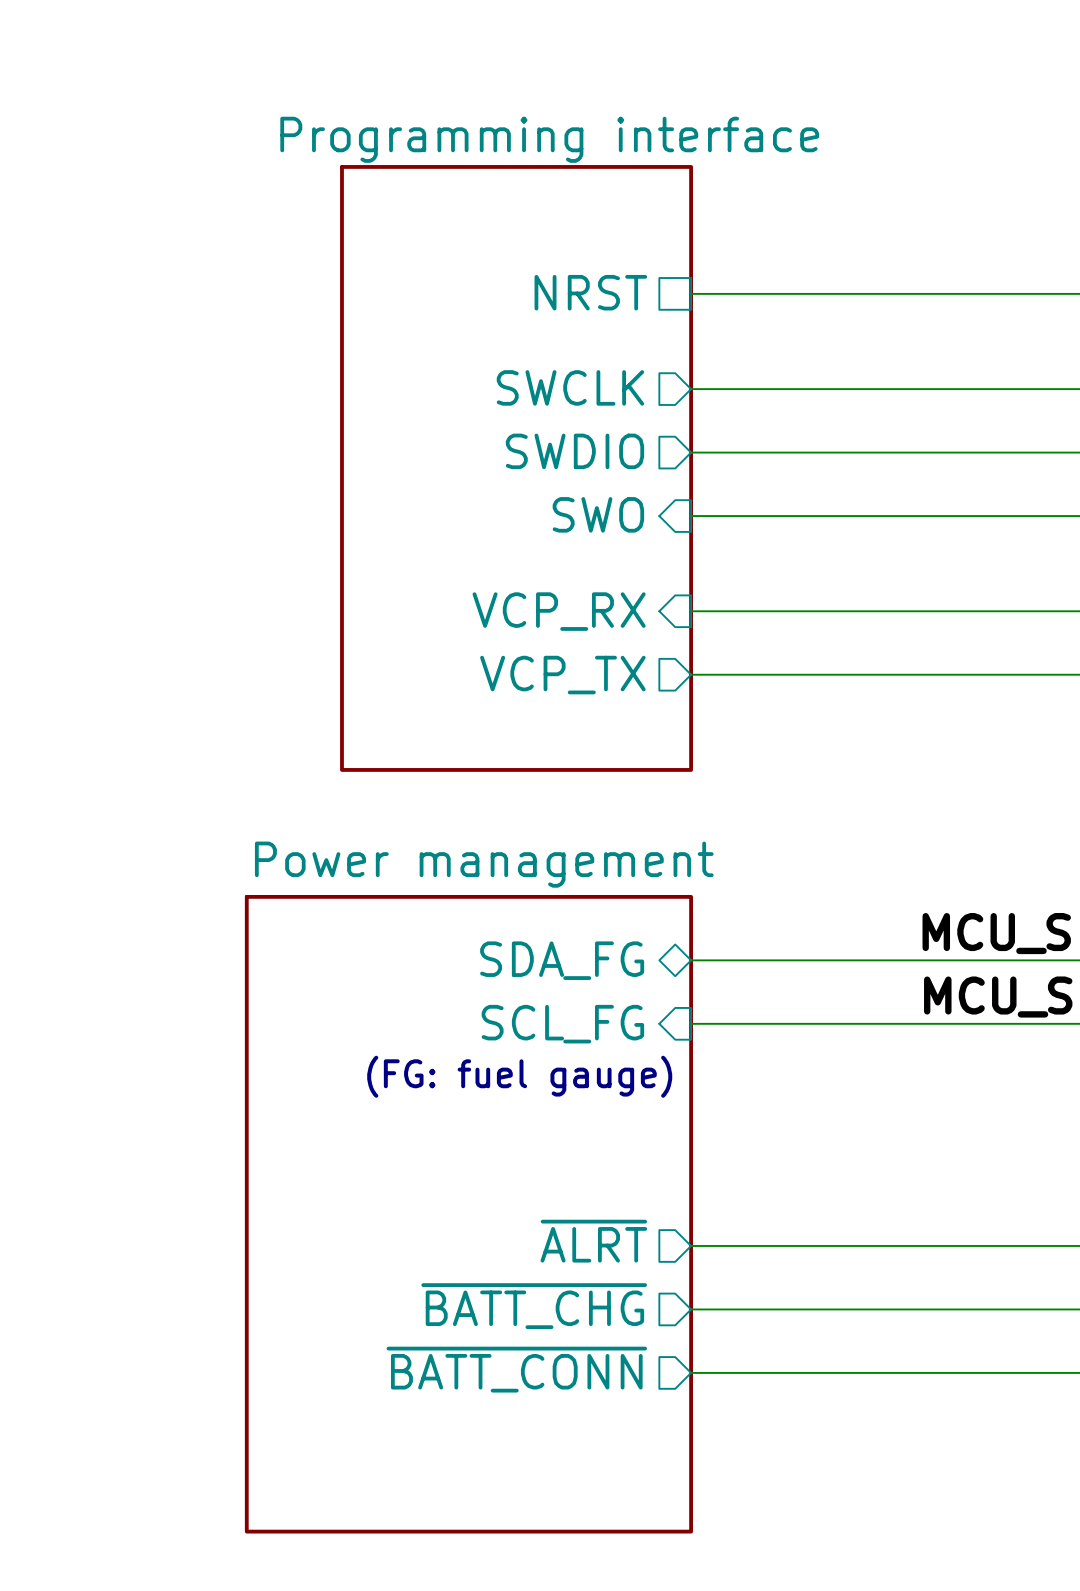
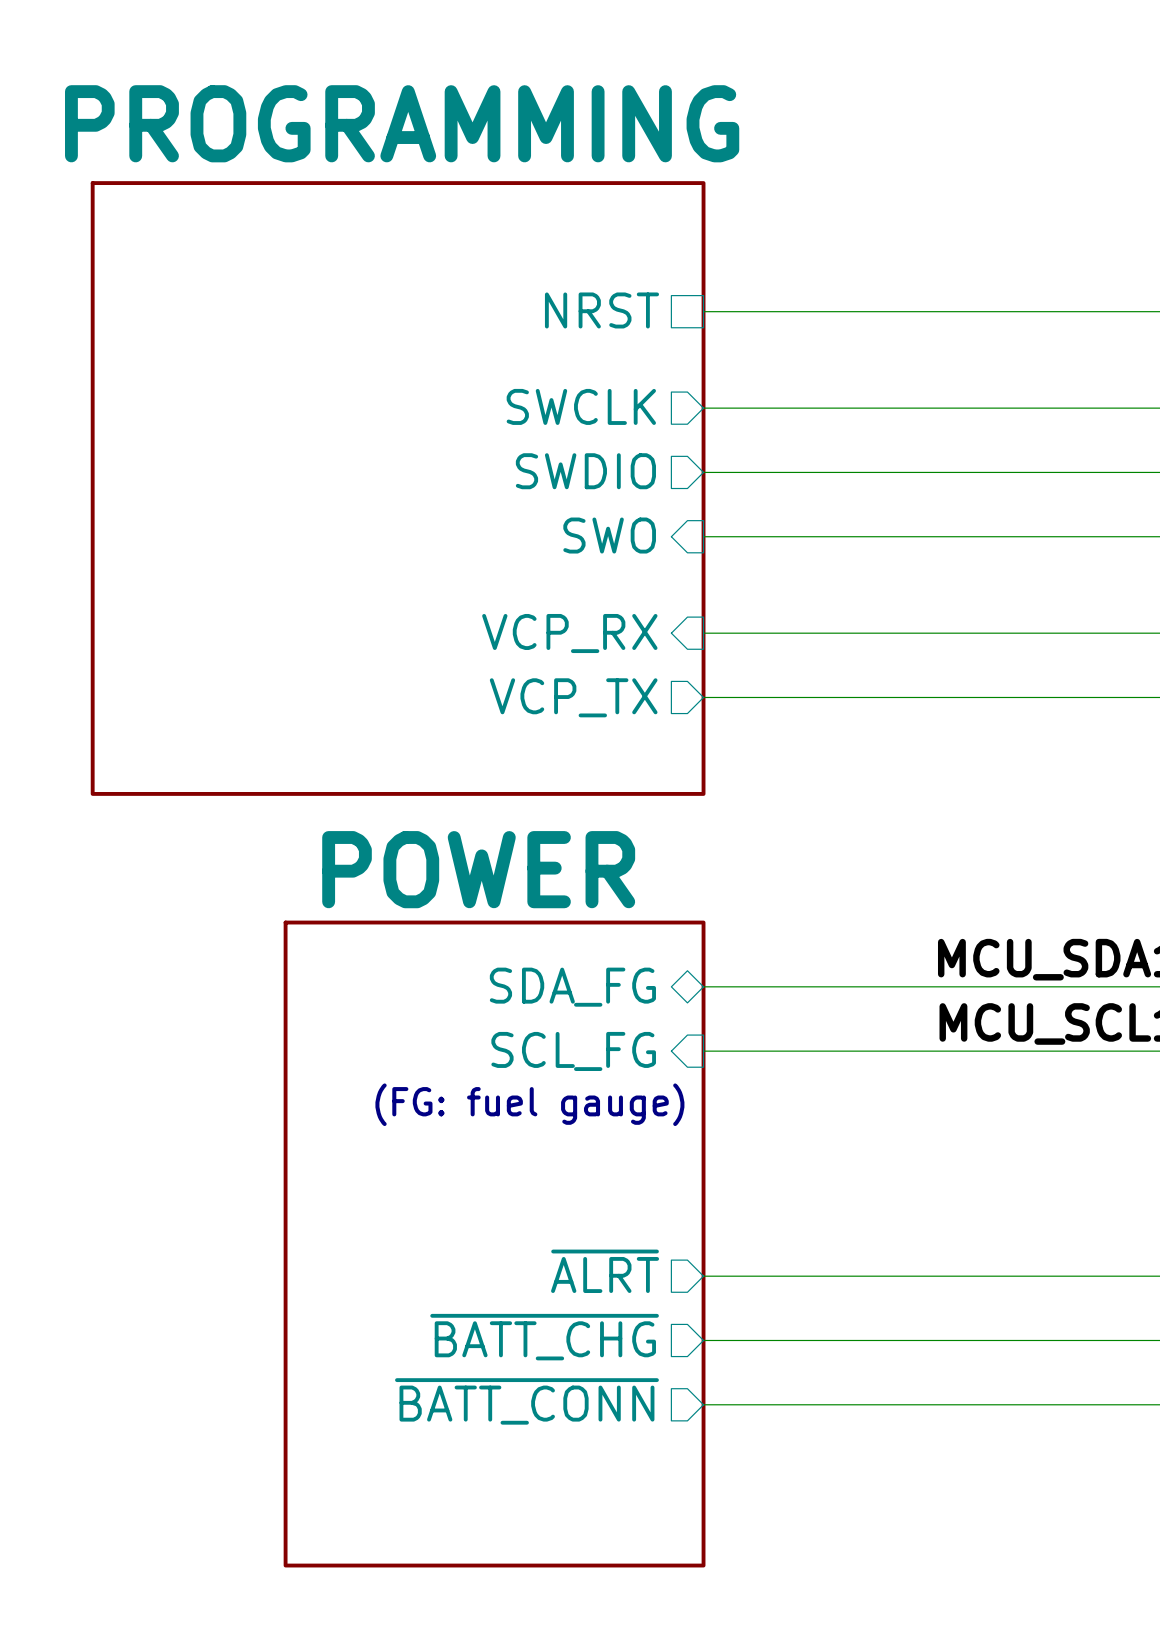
sheet PROGRAMMING: none -> (398, 488)
sheet Programming interface: (516, 468) -> none
sheet Power management: (468, 1214) -> none
sheet POWER: none -> (494, 1244)

